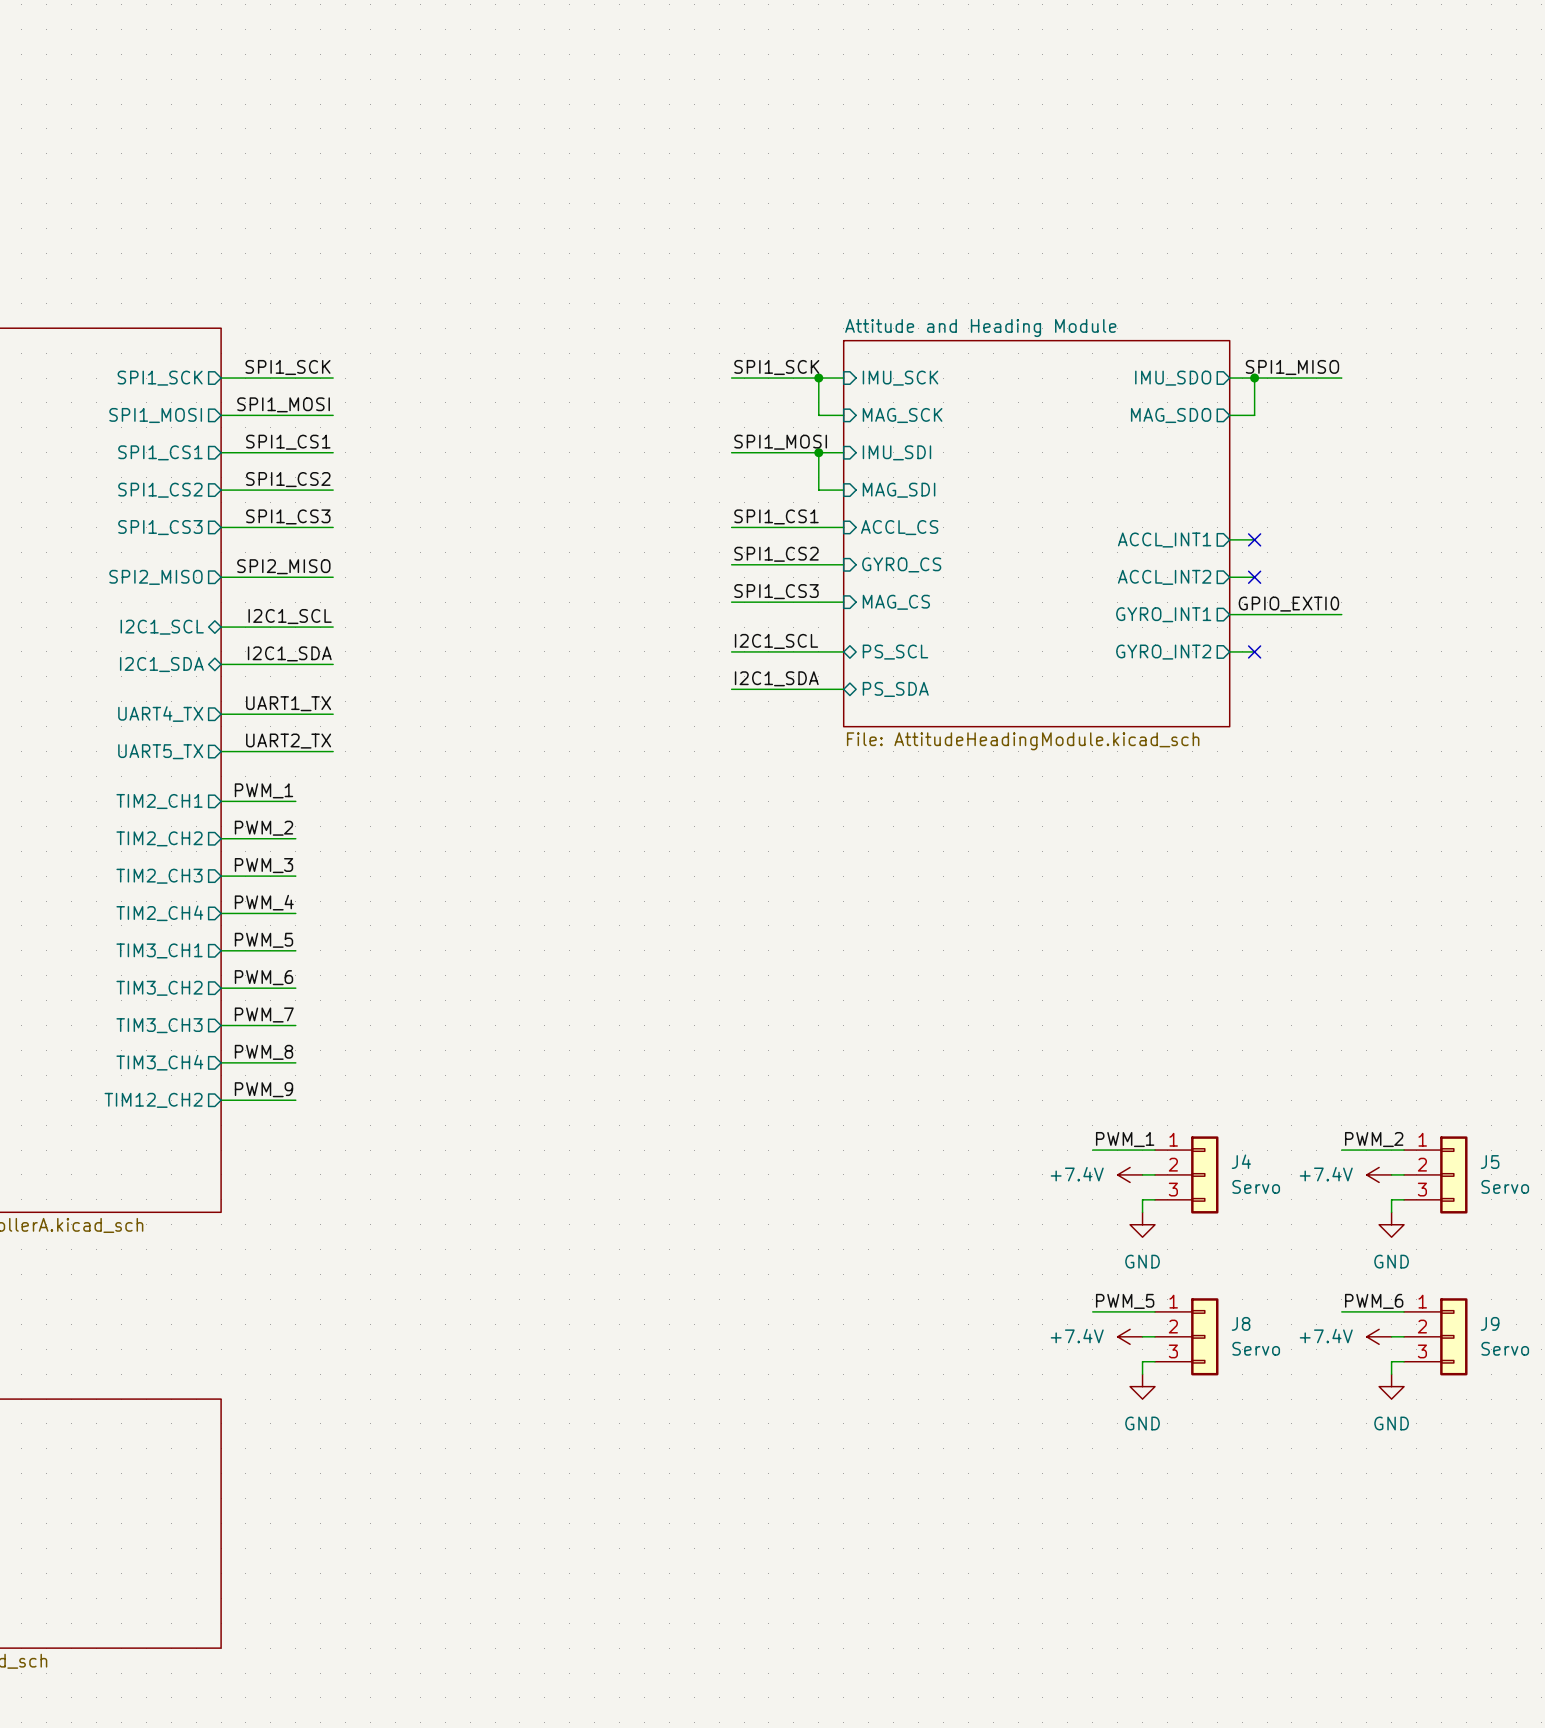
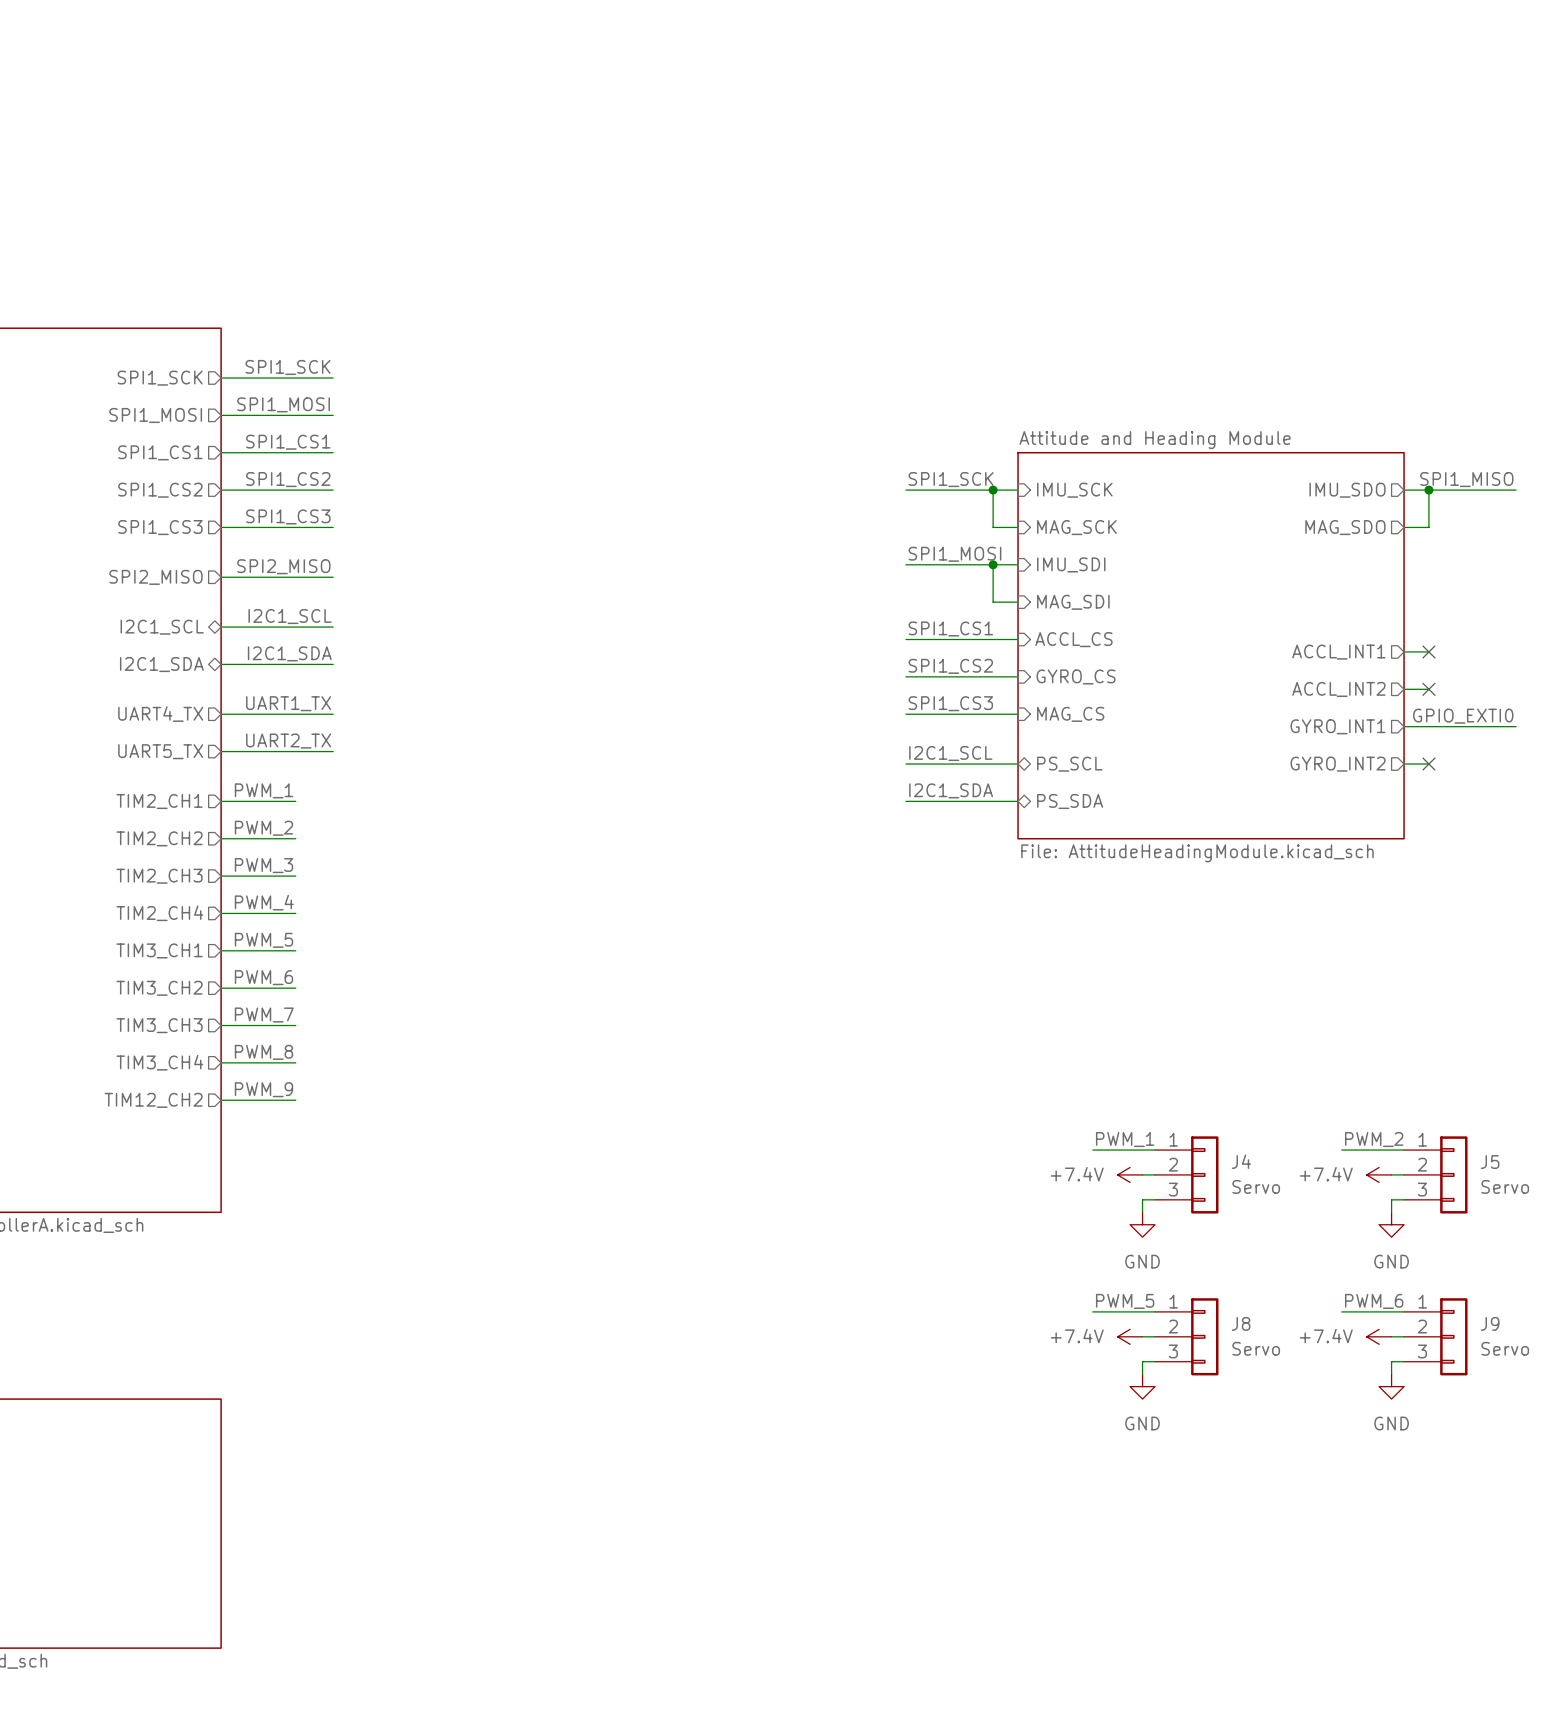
label position: SPI1_SCK (776, 367) -> SPI1_SCK (951, 479)
label position: SPI1_MISO (1292, 367) -> SPI1_MISO (1466, 479)
wire: (731, 378) (843, 378) -> (905, 490) (1018, 490)
wire: (818, 378) (818, 415) (843, 415) -> (993, 490) (993, 527) (1018, 527)
junction: (818, 378) -> none
sheet pin position: IMU_SCK (900, 378) -> IMU_SCK (1074, 490)
sheet pin position: IMU_SDO (1173, 378) -> IMU_SDO (1347, 490)
wire: (1229, 378) (1341, 378) -> (1404, 490) (1516, 490)
wire: (1254, 378) (1254, 415) (1229, 415) -> (1428, 490) (1428, 527) (1404, 527)
junction: (1254, 378) -> none
sheet pin position: MAG_SCK (902, 415) -> MAG_SCK (1076, 527)
sheet pin position: MAG_SDO (1171, 415) -> MAG_SDO (1345, 527)
label position: SPI1_MOSI (780, 442) -> SPI1_MOSI (954, 554)
wire: (731, 452) (843, 452) -> (905, 564) (1018, 564)
wire: (818, 452) (818, 490) (843, 490) -> (993, 564) (993, 602) (1018, 602)
junction: (818, 452) -> none
sheet pin position: IMU_SDI (896, 452) -> IMU_SDI (1071, 564)
sheet pin position: MAG_SDI (899, 490) -> MAG_SDI (1073, 602)
junction: none -> (993, 490)
junction: none -> (1428, 490)
label position: SPI1_CS1 (776, 516) -> SPI1_CS1 (950, 628)
wire: (731, 527) (843, 527) -> (905, 639) (1018, 639)
sheet pin position: ACCL_CS (899, 527) -> ACCL_CS (1073, 639)
sheet Attitude and Heading Module position: (1036, 533) -> (1211, 645)
wire: (1229, 539) (1254, 539) -> (1404, 651) (1428, 651)
no-connect mark: (1254, 539) -> none
sheet pin position: ACCL_INT1 (1164, 540) -> ACCL_INT1 (1338, 652)
label position: SPI1_CS2 (776, 554) -> SPI1_CS2 (950, 666)
wire: (731, 564) (843, 564) -> (905, 676) (1018, 676)
sheet pin position: GYRO_CS (901, 564) -> GYRO_CS (1076, 676)
junction: none -> (993, 564)
sheet pin position: ACCL_INT2 (1164, 577) -> ACCL_INT2 (1338, 689)
wire: (1229, 577) (1254, 577) -> (1404, 689) (1428, 689)
no-connect mark: (1254, 577) -> none
label position: SPI1_CS3 (776, 591) -> SPI1_CS3 (950, 703)
wire: (731, 602) (843, 602) -> (905, 714) (1018, 714)
sheet pin position: MAG_CS (896, 602) -> MAG_CS (1070, 714)
label position: GPIO_EXTI0 (1288, 604) -> GPIO_EXTI0 (1463, 716)
sheet pin position: GYRO_INT1 (1163, 614) -> GYRO_INT1 (1338, 726)
wire: (1229, 614) (1341, 614) -> (1404, 726) (1516, 726)
label position: I2C1_SCL (776, 641) -> I2C1_SCL (950, 753)
wire: (731, 651) (843, 651) -> (905, 764) (1018, 764)
wire: (1229, 651) (1254, 651) -> (1404, 764) (1428, 764)
no-connect mark: (1254, 651) -> none
no-connect mark: none -> (1428, 651)
sheet pin position: PS_SCL (895, 652) -> PS_SCL (1069, 764)
sheet pin position: GYRO_INT2 (1163, 652) -> GYRO_INT2 (1338, 764)
label position: I2C1_SDA (776, 678) -> I2C1_SDA (951, 790)
wire: (731, 689) (843, 689) -> (905, 801) (1018, 801)
sheet pin position: PS_SDA (895, 689) -> PS_SDA (1070, 801)
no-connect mark: none -> (1428, 689)
no-connect mark: none -> (1428, 764)

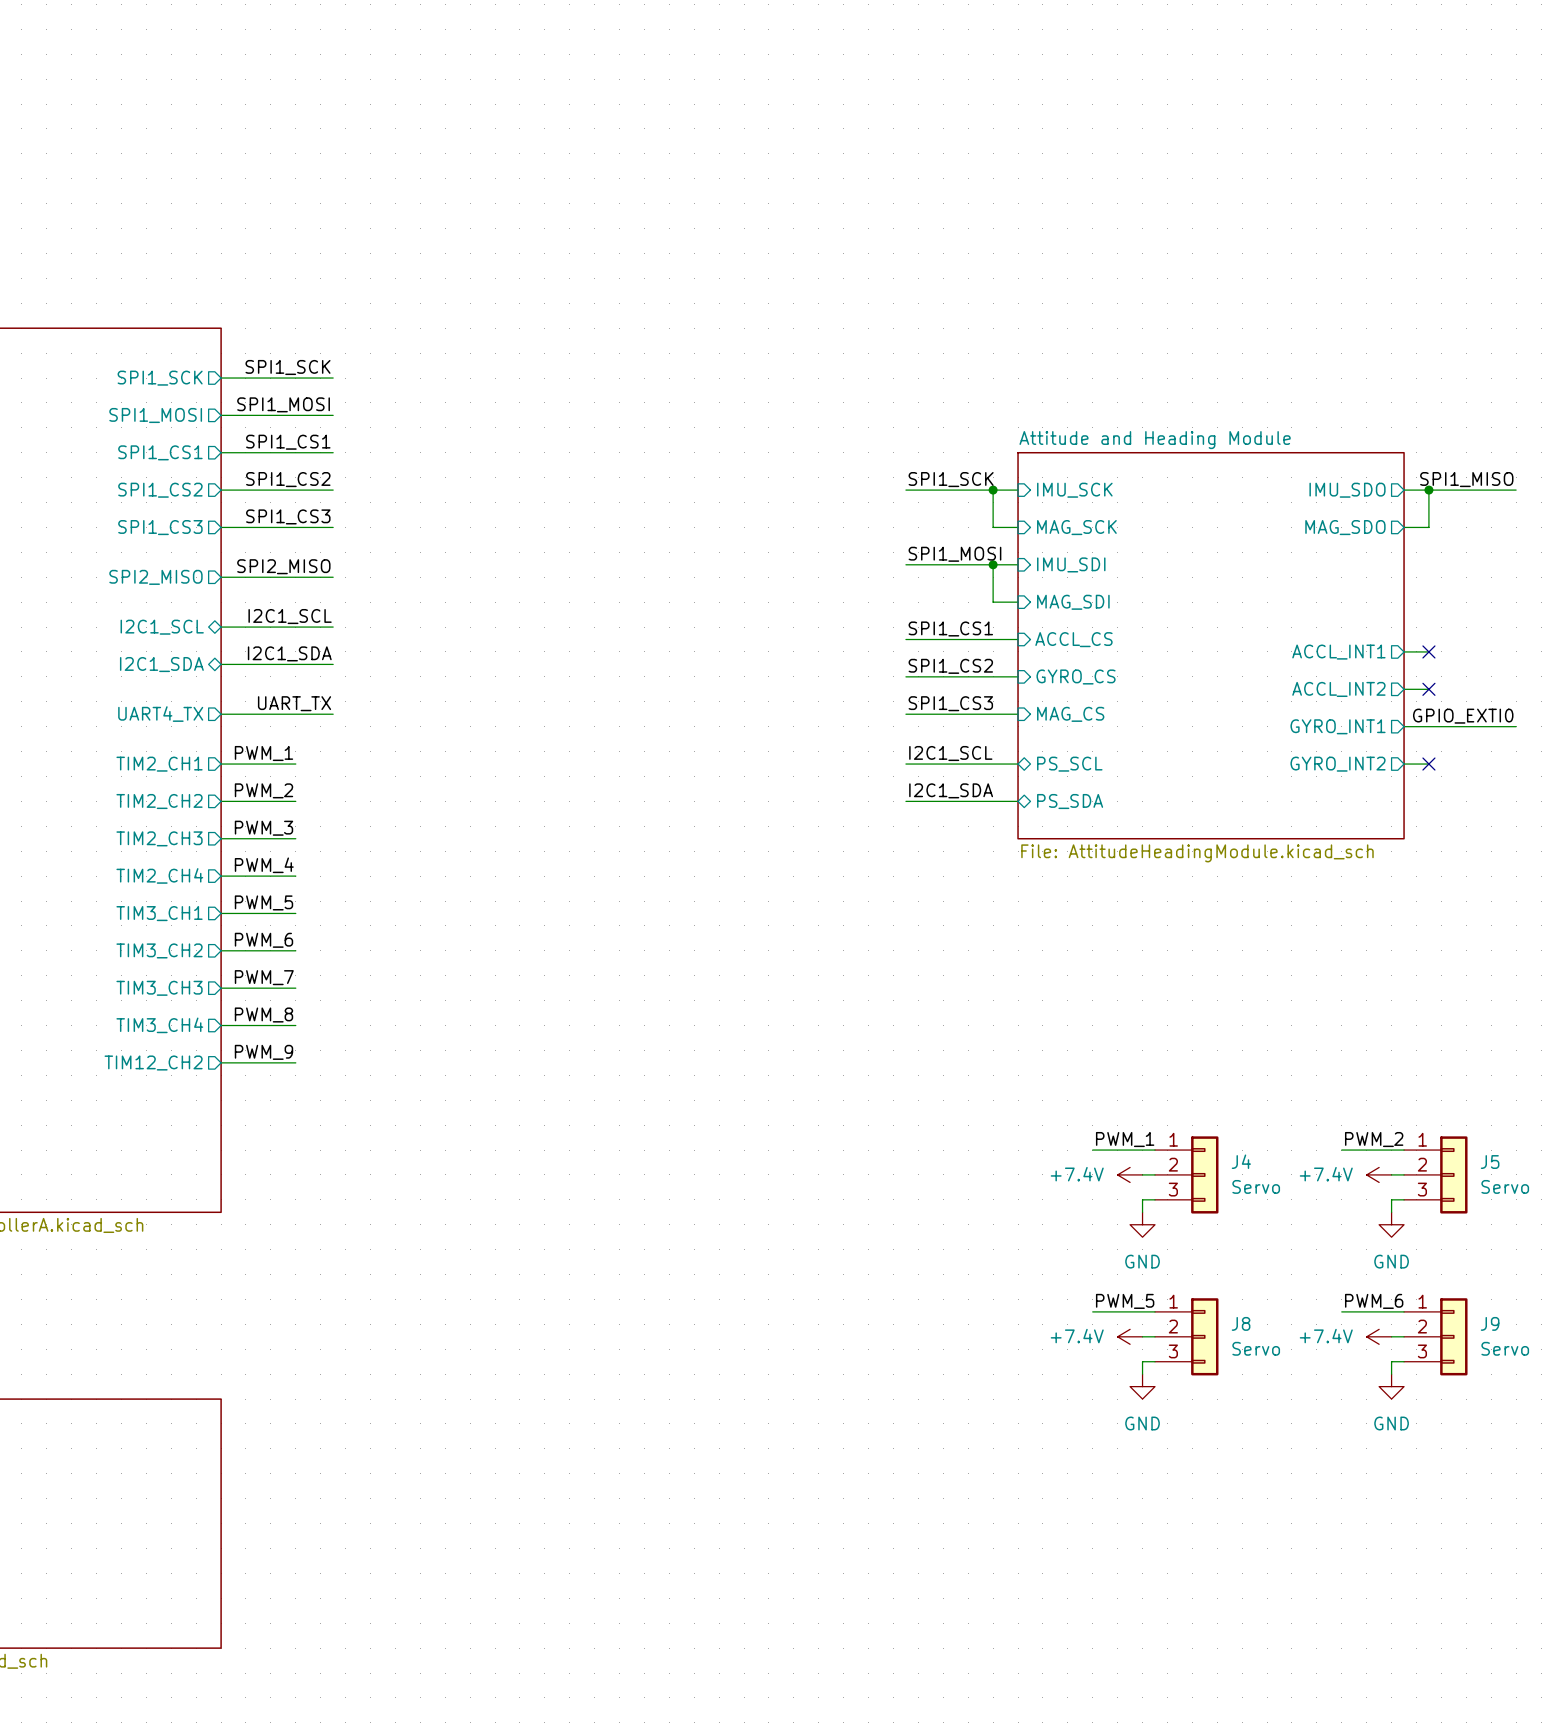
label: UART1_TX (288, 703) -> UART_TX (294, 703)
label: UART2_TX (288, 741) -> none
sheet pin: UART5_TX (160, 751) -> none
wire: (221, 751) (333, 751) -> none
label: none -> PWM_1 (263, 753)
sheet pin: none -> TIM2_CH1 (159, 764)
wire: none -> (221, 764) (295, 764)
label: PWM_1 (263, 790) -> PWM_2 (263, 790)
sheet pin: TIM2_CH1 (159, 801) -> TIM2_CH2 (159, 801)
label: PWM_2 (263, 828) -> PWM_3 (263, 828)
sheet pin: TIM2_CH2 (159, 838) -> TIM2_CH3 (159, 838)
label: PWM_3 (263, 865) -> PWM_4 (264, 865)
sheet pin: TIM2_CH3 (159, 876) -> TIM2_CH4 (159, 875)
label: PWM_4 (264, 902) -> PWM_5 (263, 902)
sheet pin: TIM2_CH4 (159, 913) -> TIM3_CH1 (159, 913)
label: PWM_5 (263, 940) -> PWM_6 (263, 940)
sheet pin: TIM3_CH1 (159, 950) -> TIM3_CH2 (159, 950)
label: PWM_6 (263, 977) -> PWM_7 (264, 977)
sheet pin: TIM3_CH2 (159, 988) -> TIM3_CH3 (159, 988)
label: PWM_7 (264, 1015) -> PWM_8 (263, 1015)
sheet pin: TIM3_CH3 (159, 1025) -> TIM3_CH4 (159, 1025)
label: PWM_8 (263, 1052) -> PWM_9 (263, 1052)
sheet pin: TIM3_CH4 (159, 1062) -> TIM12_CH2 (153, 1063)
label: PWM_9 (263, 1089) -> none
sheet pin: TIM12_CH2 (153, 1100) -> none
wire: (221, 1100) (295, 1100) -> none

